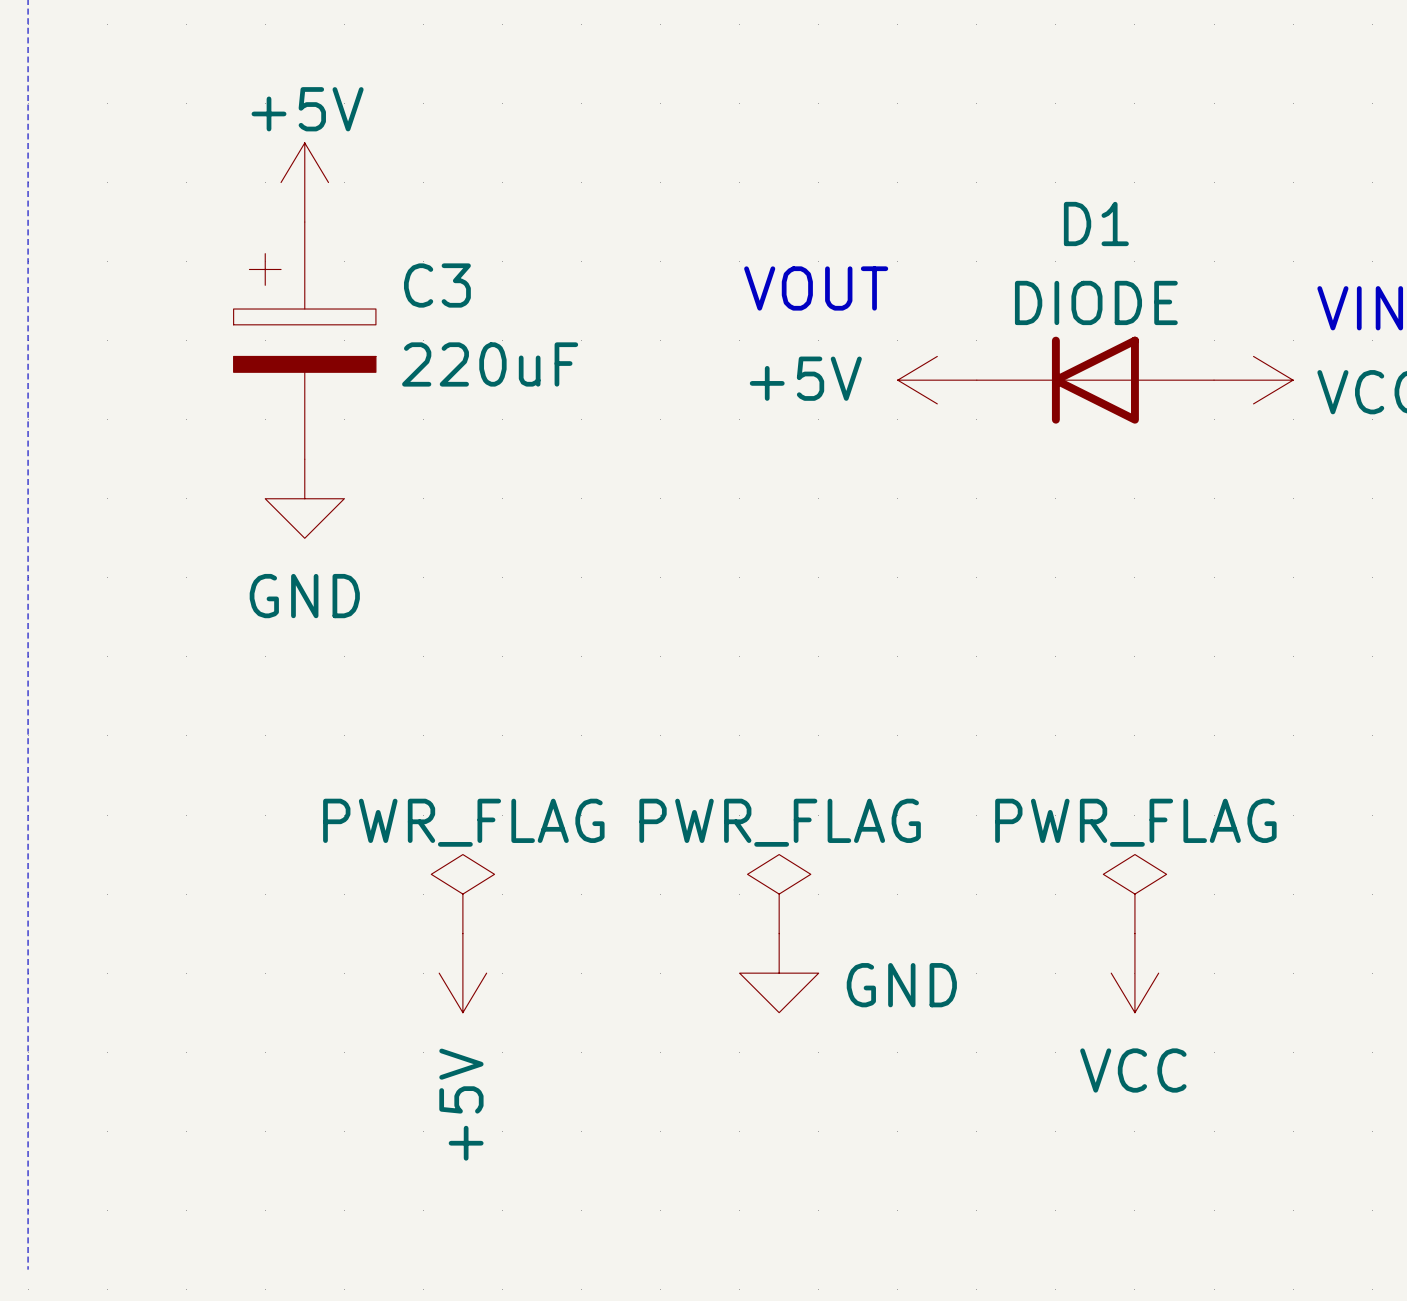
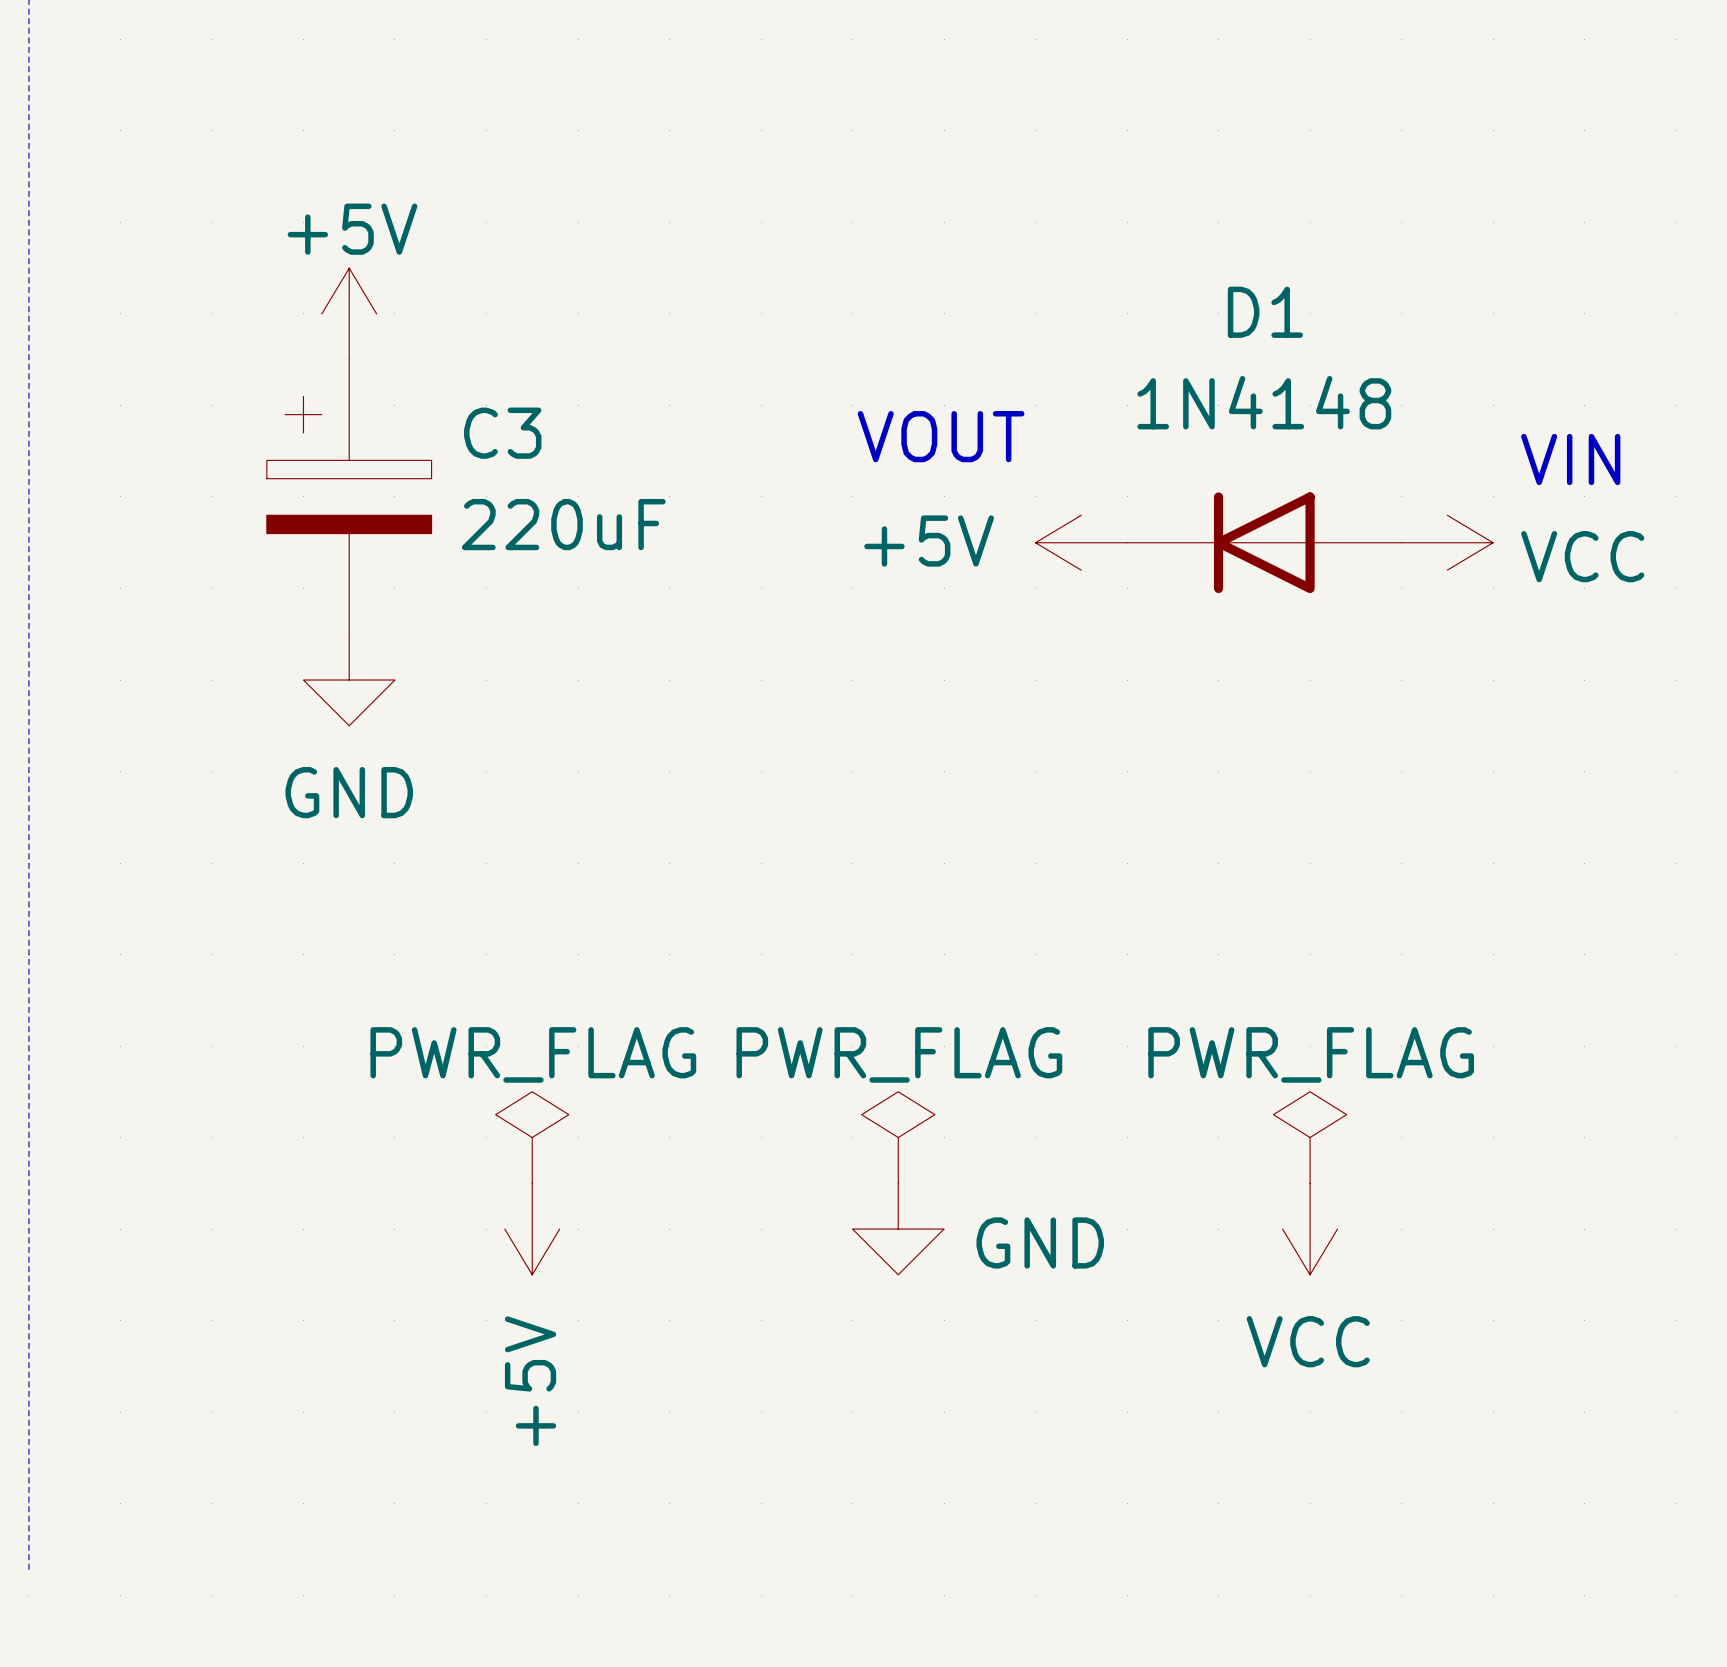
D1 name position: D1 (1096, 223) -> D1 (1265, 312)
D1 value: DIODE (1096, 302) -> 1N4148 (1264, 402)

